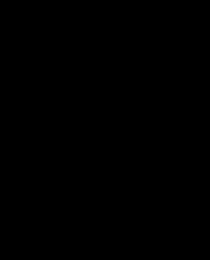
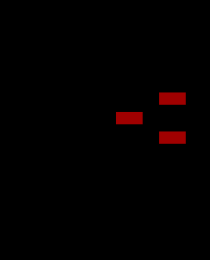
part: none -> (150, 118)

